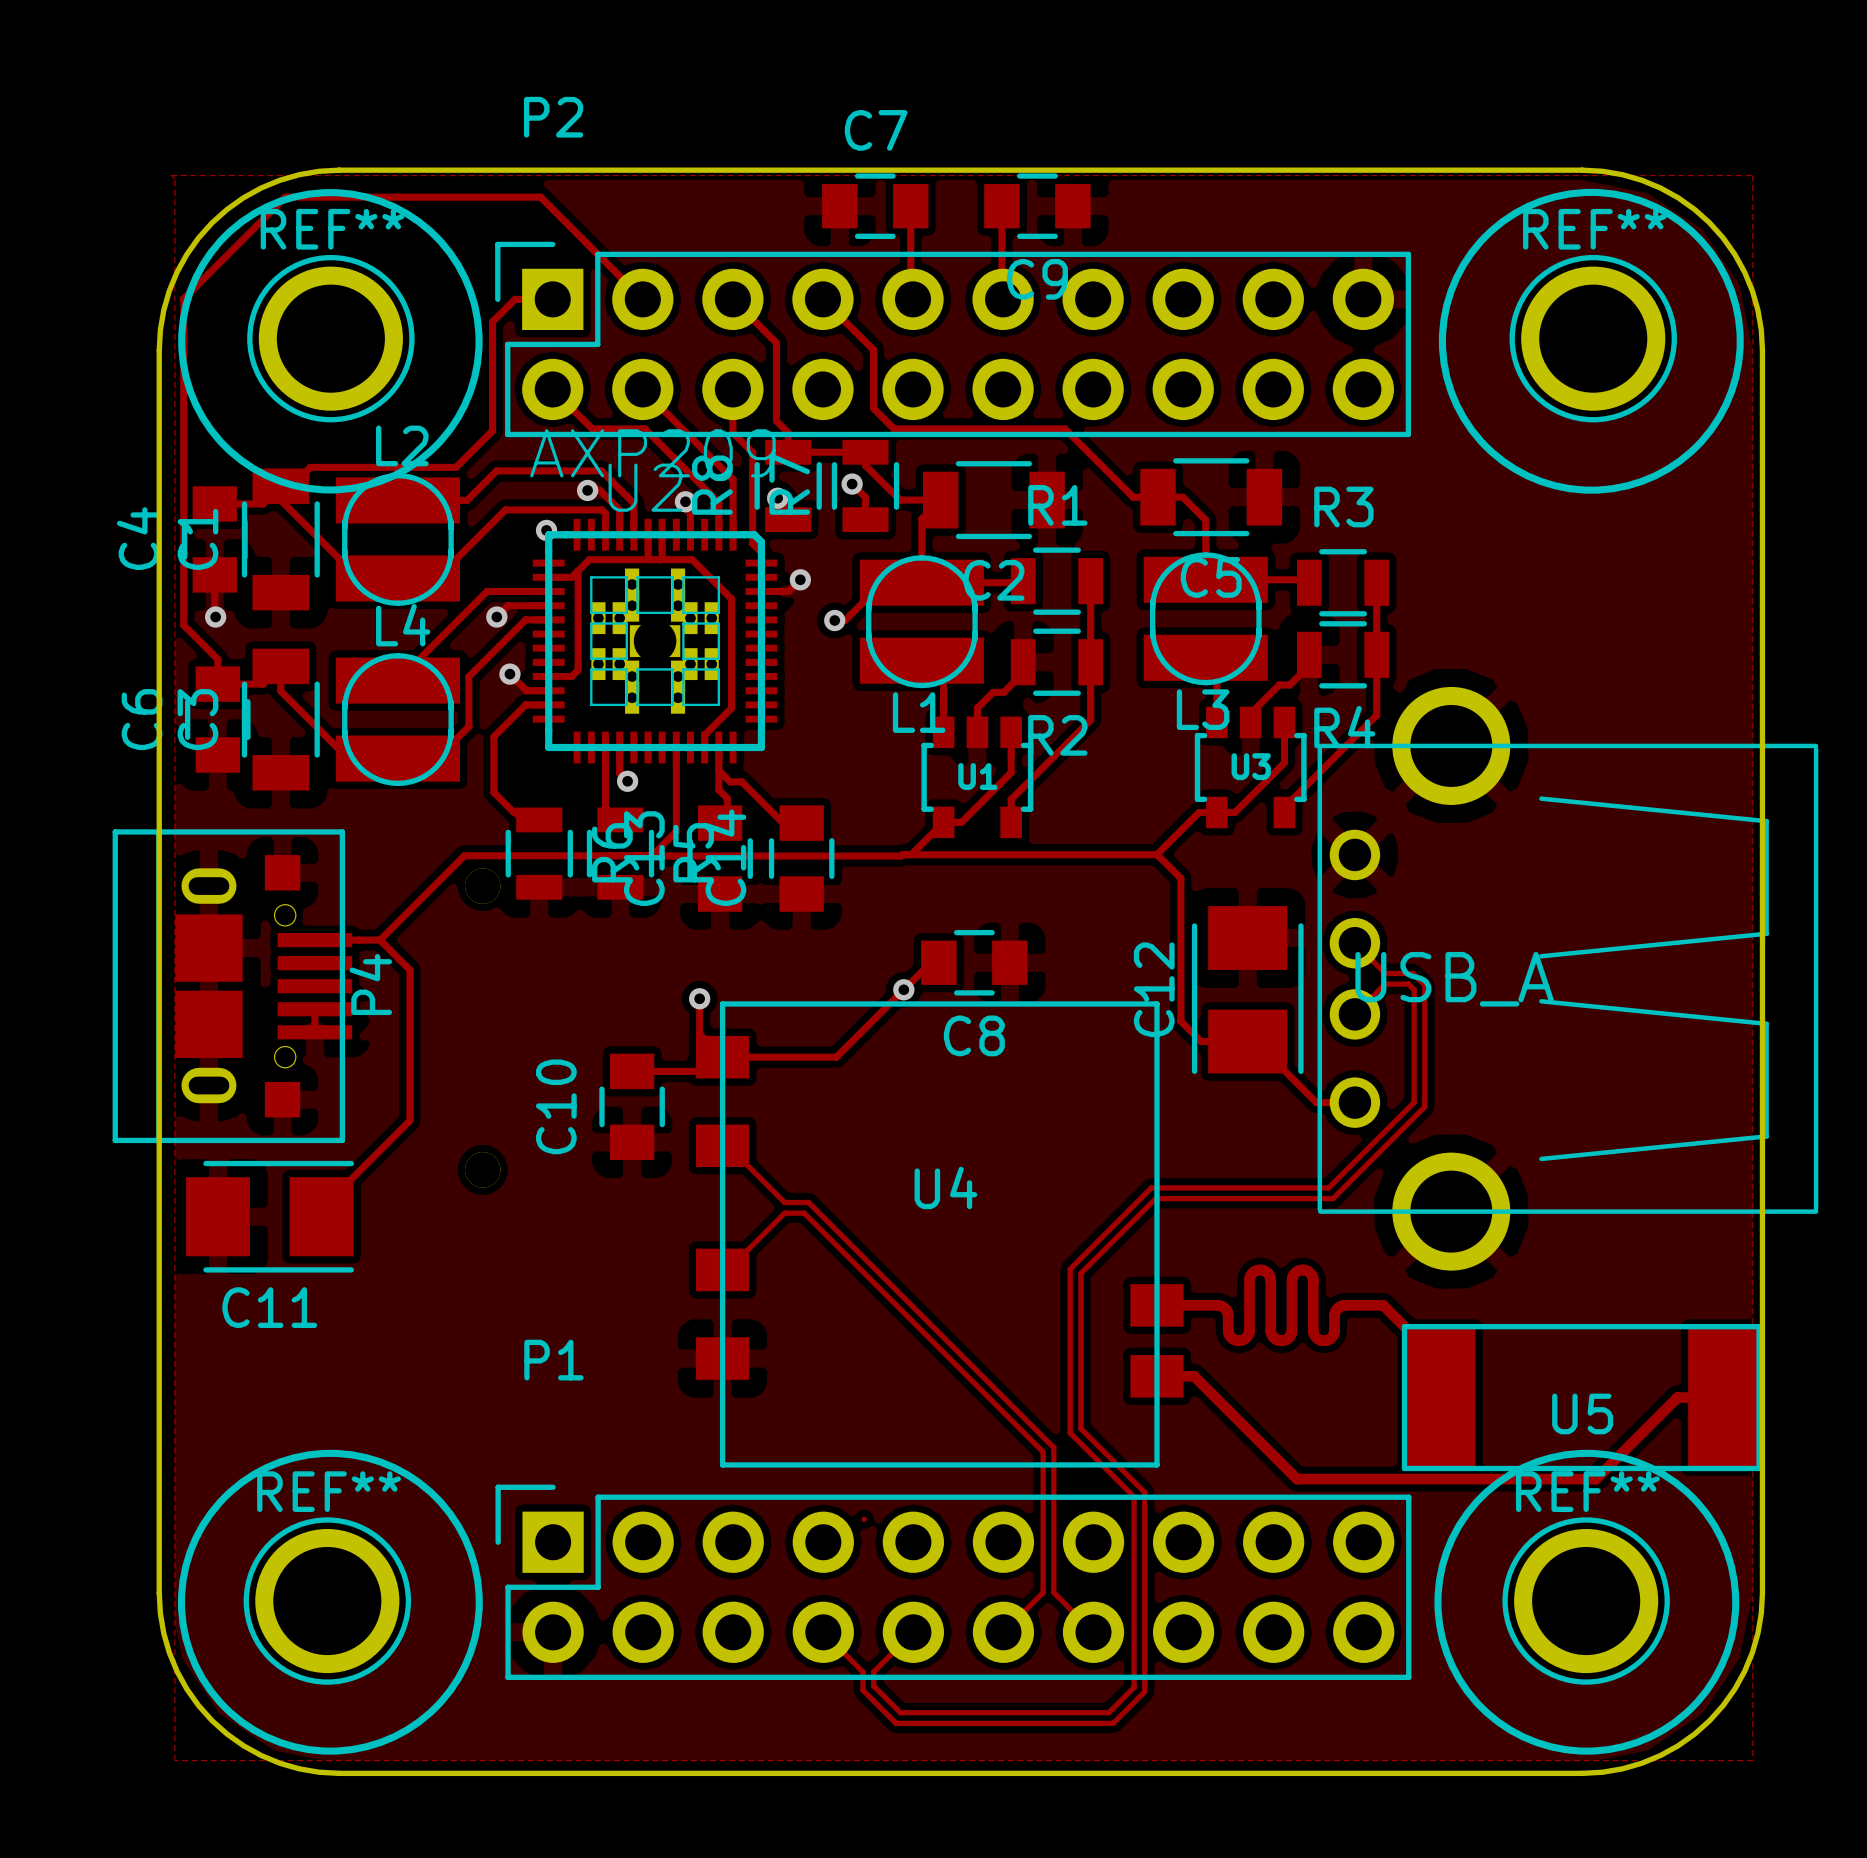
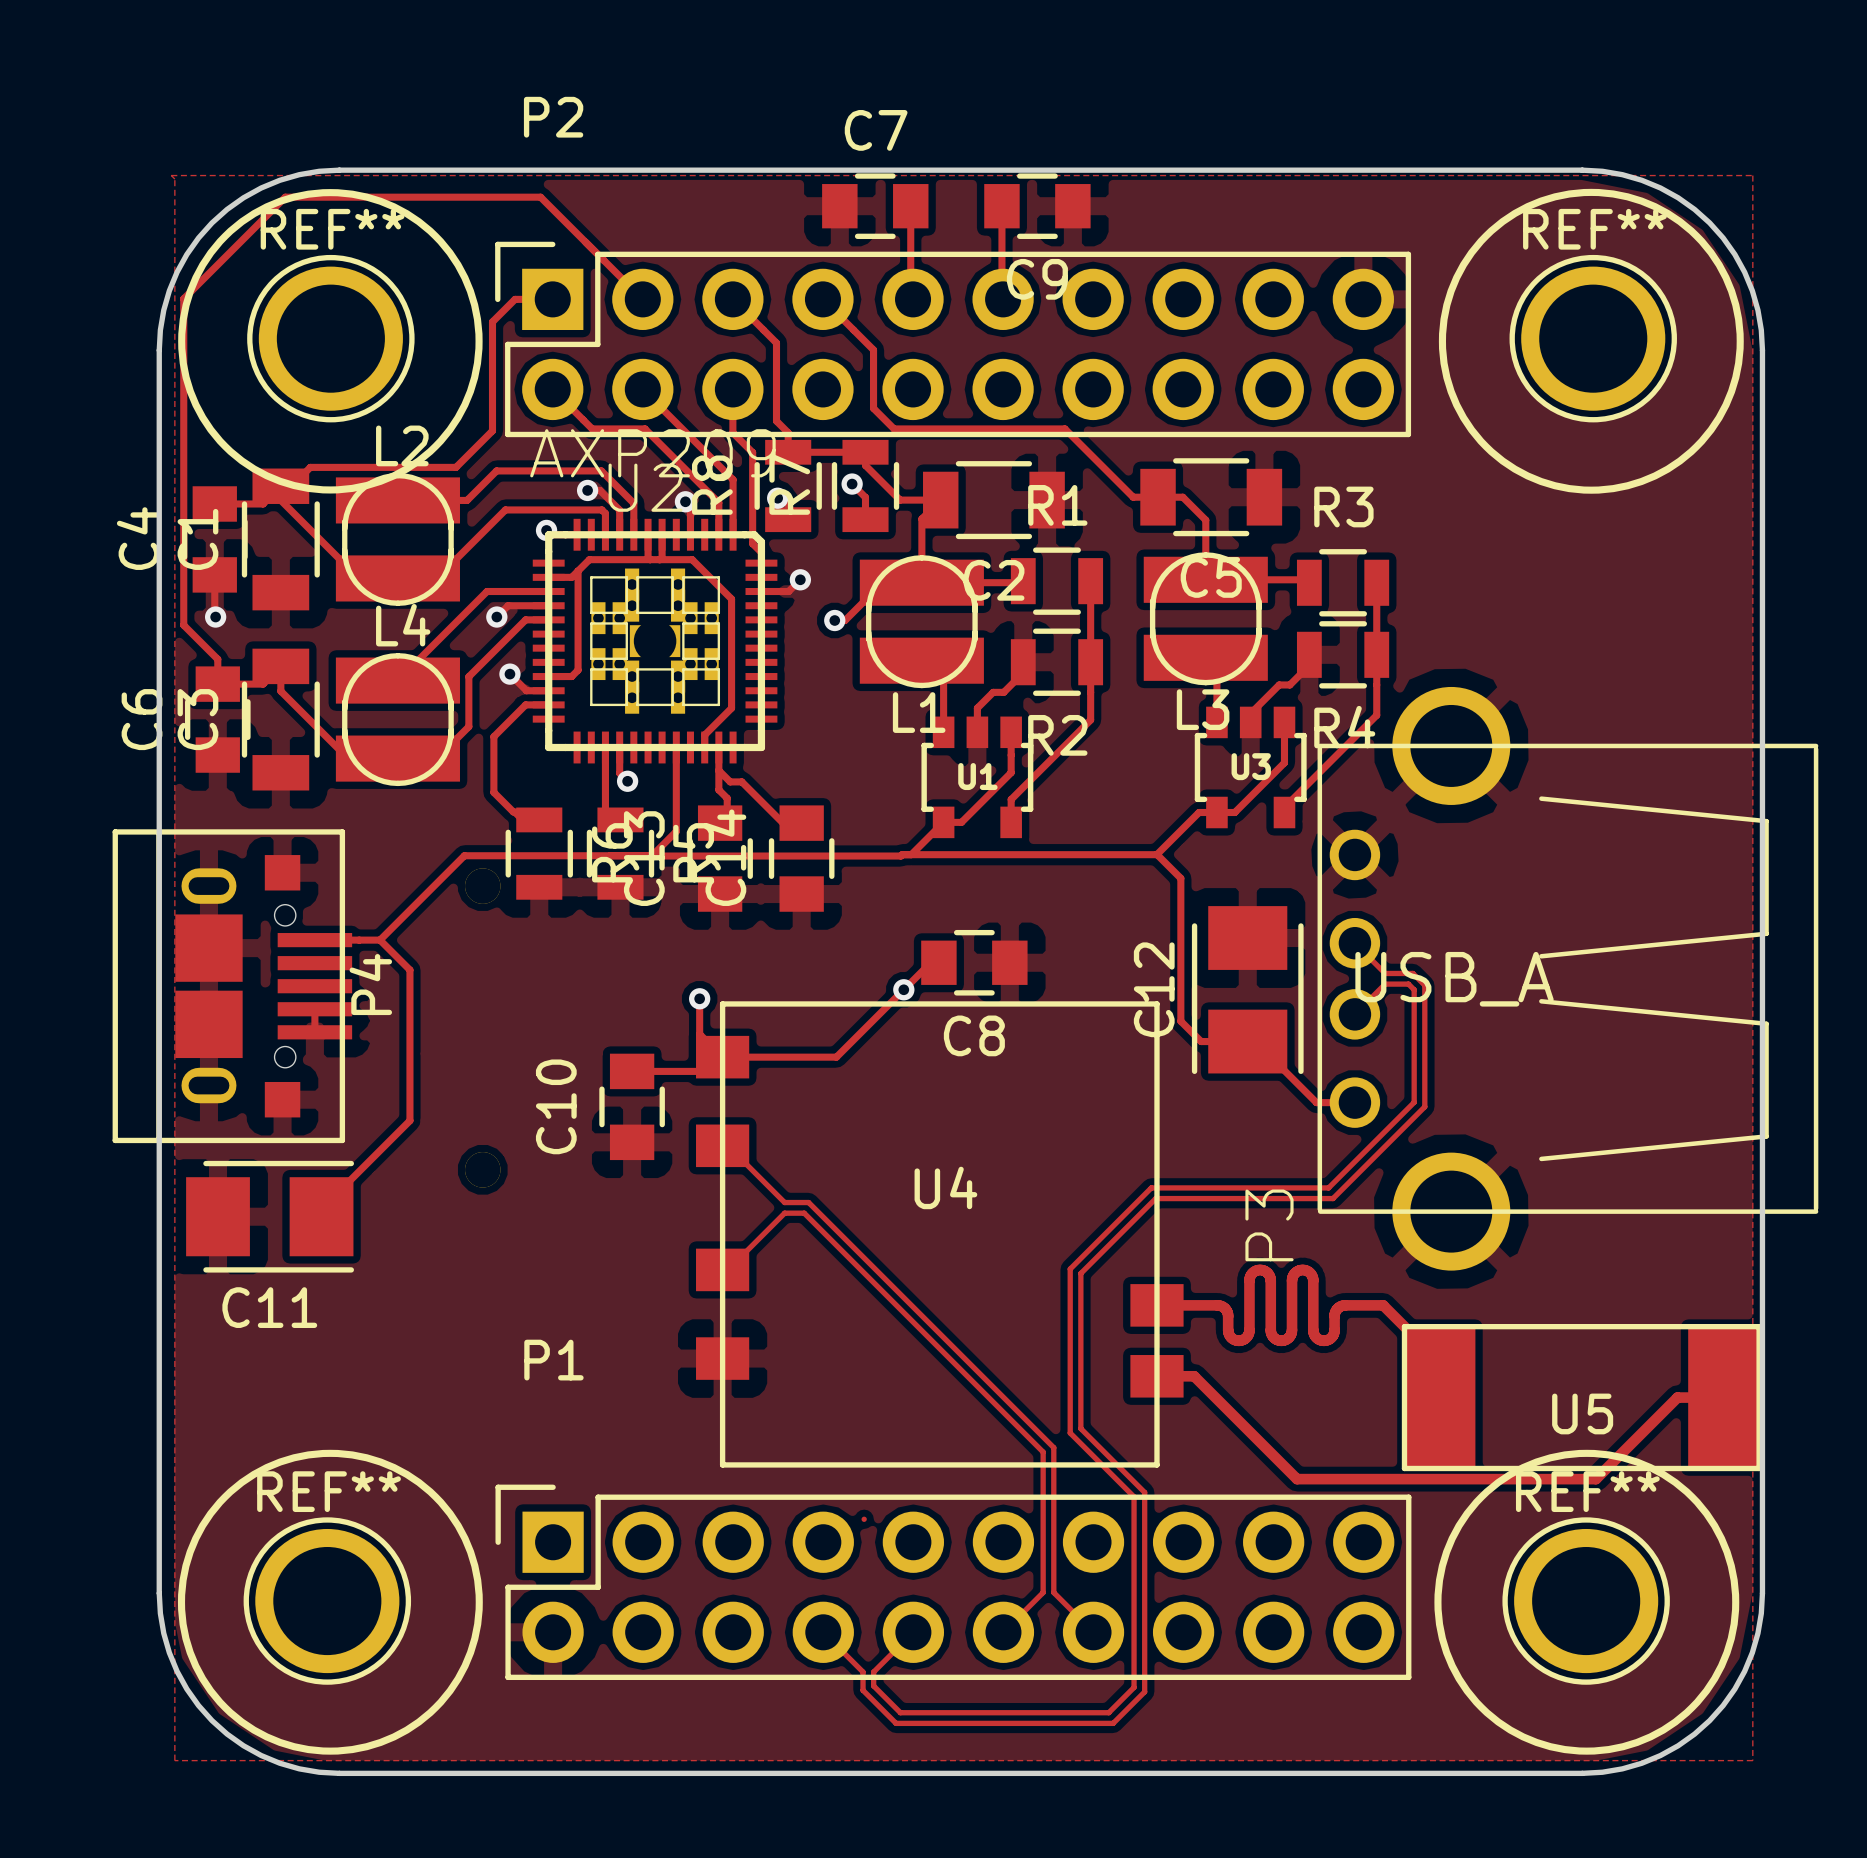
P3 name: none -> P3 (1269, 1225)

